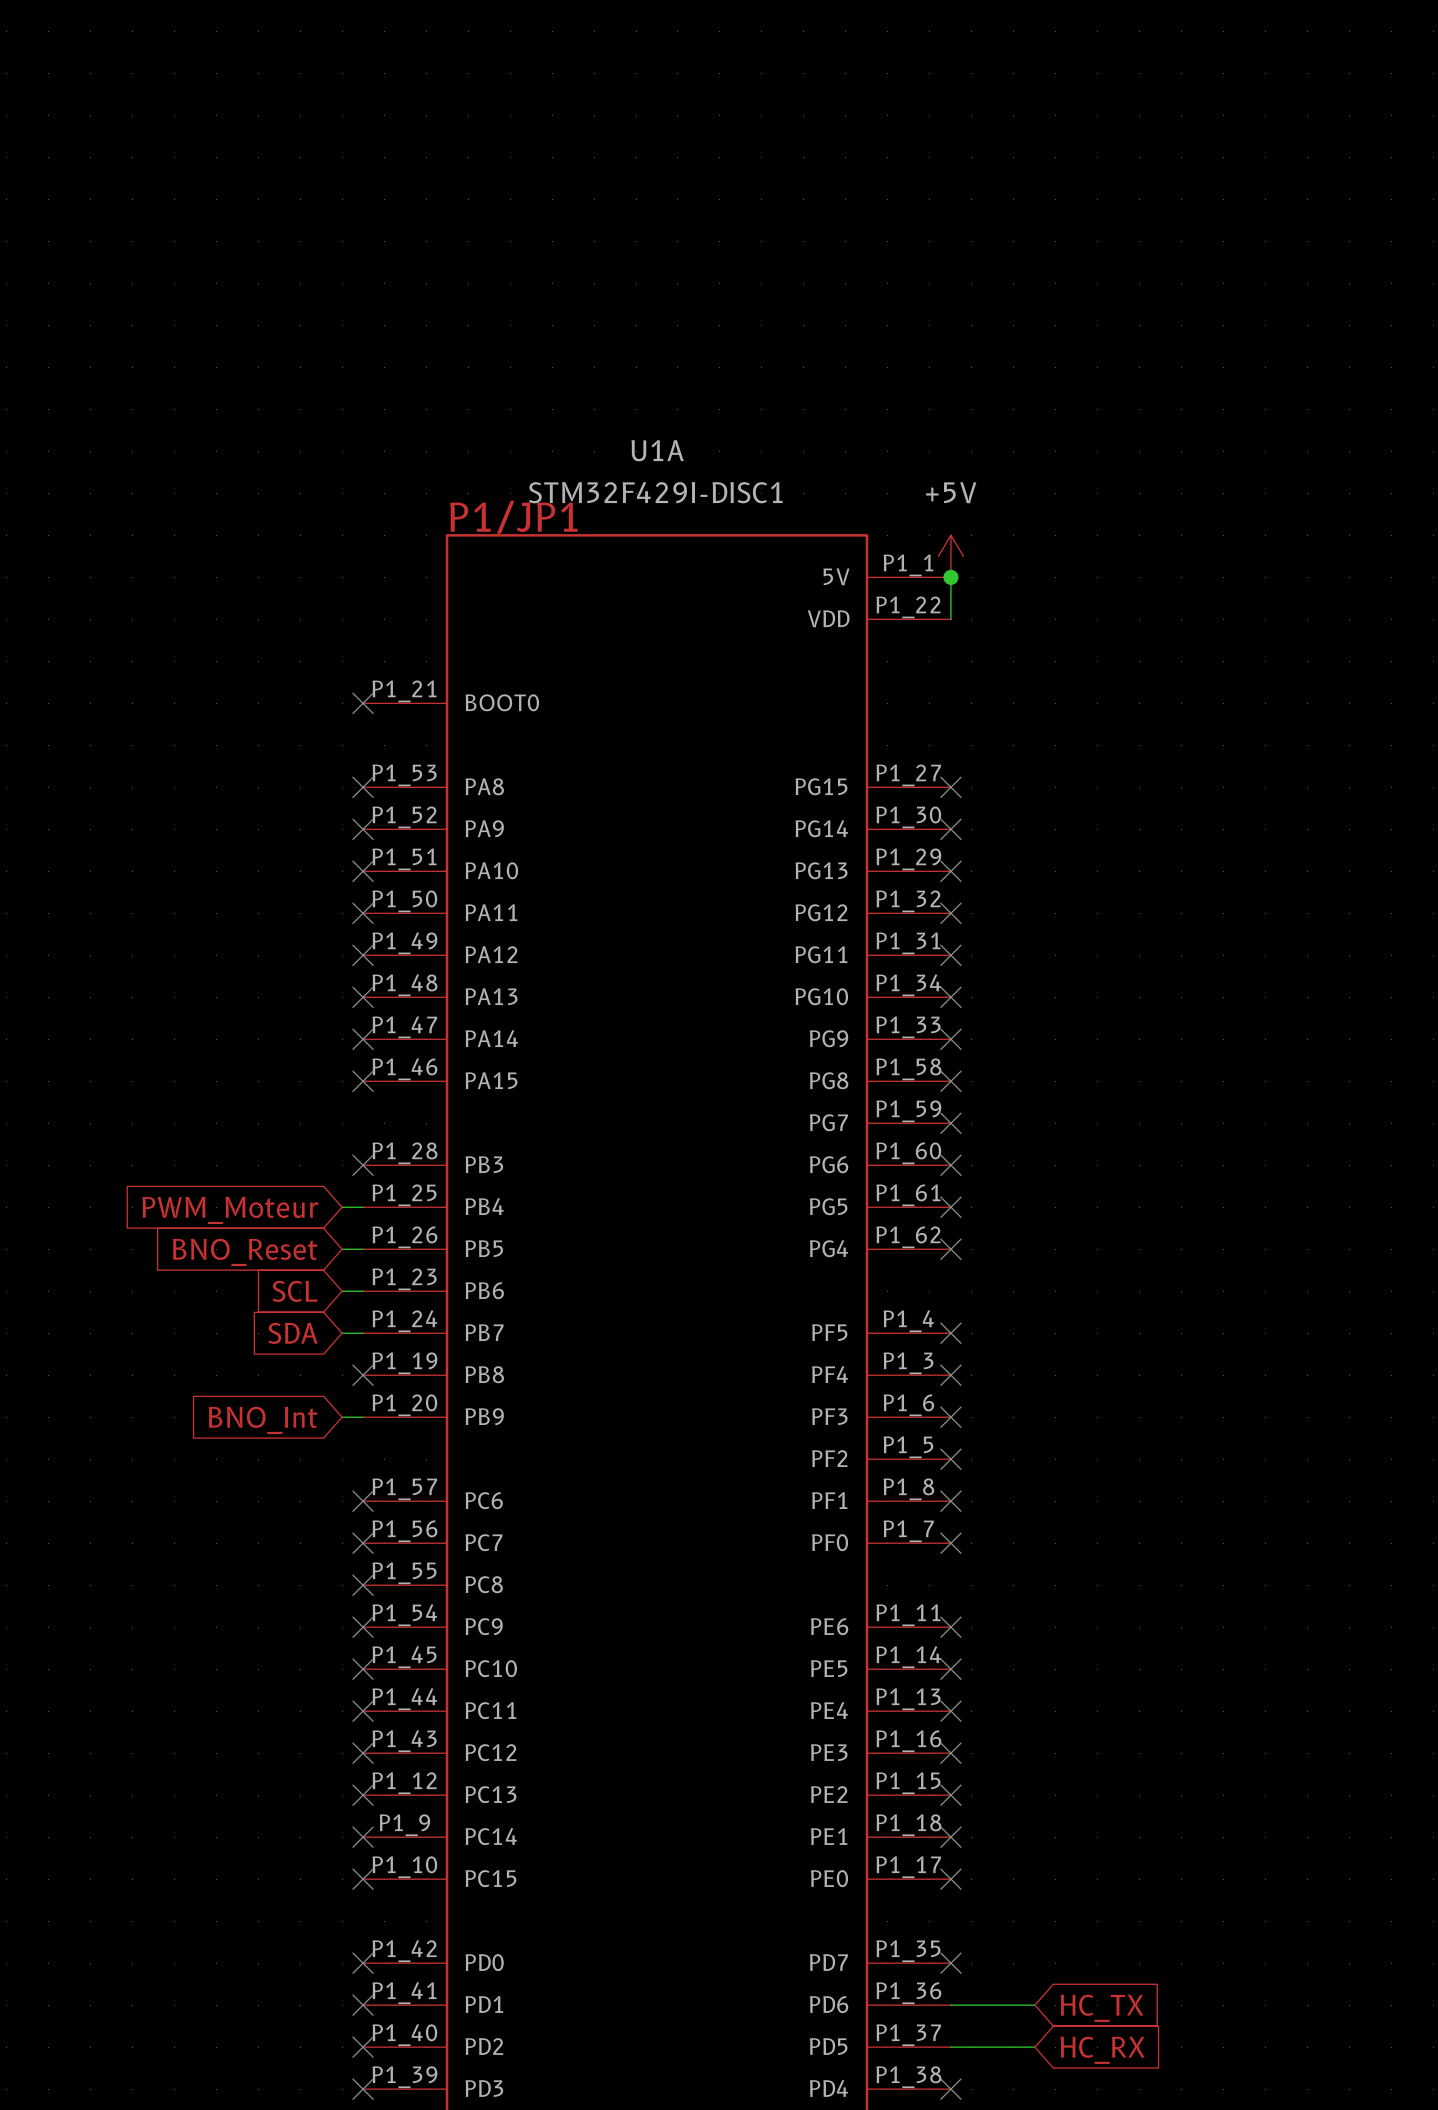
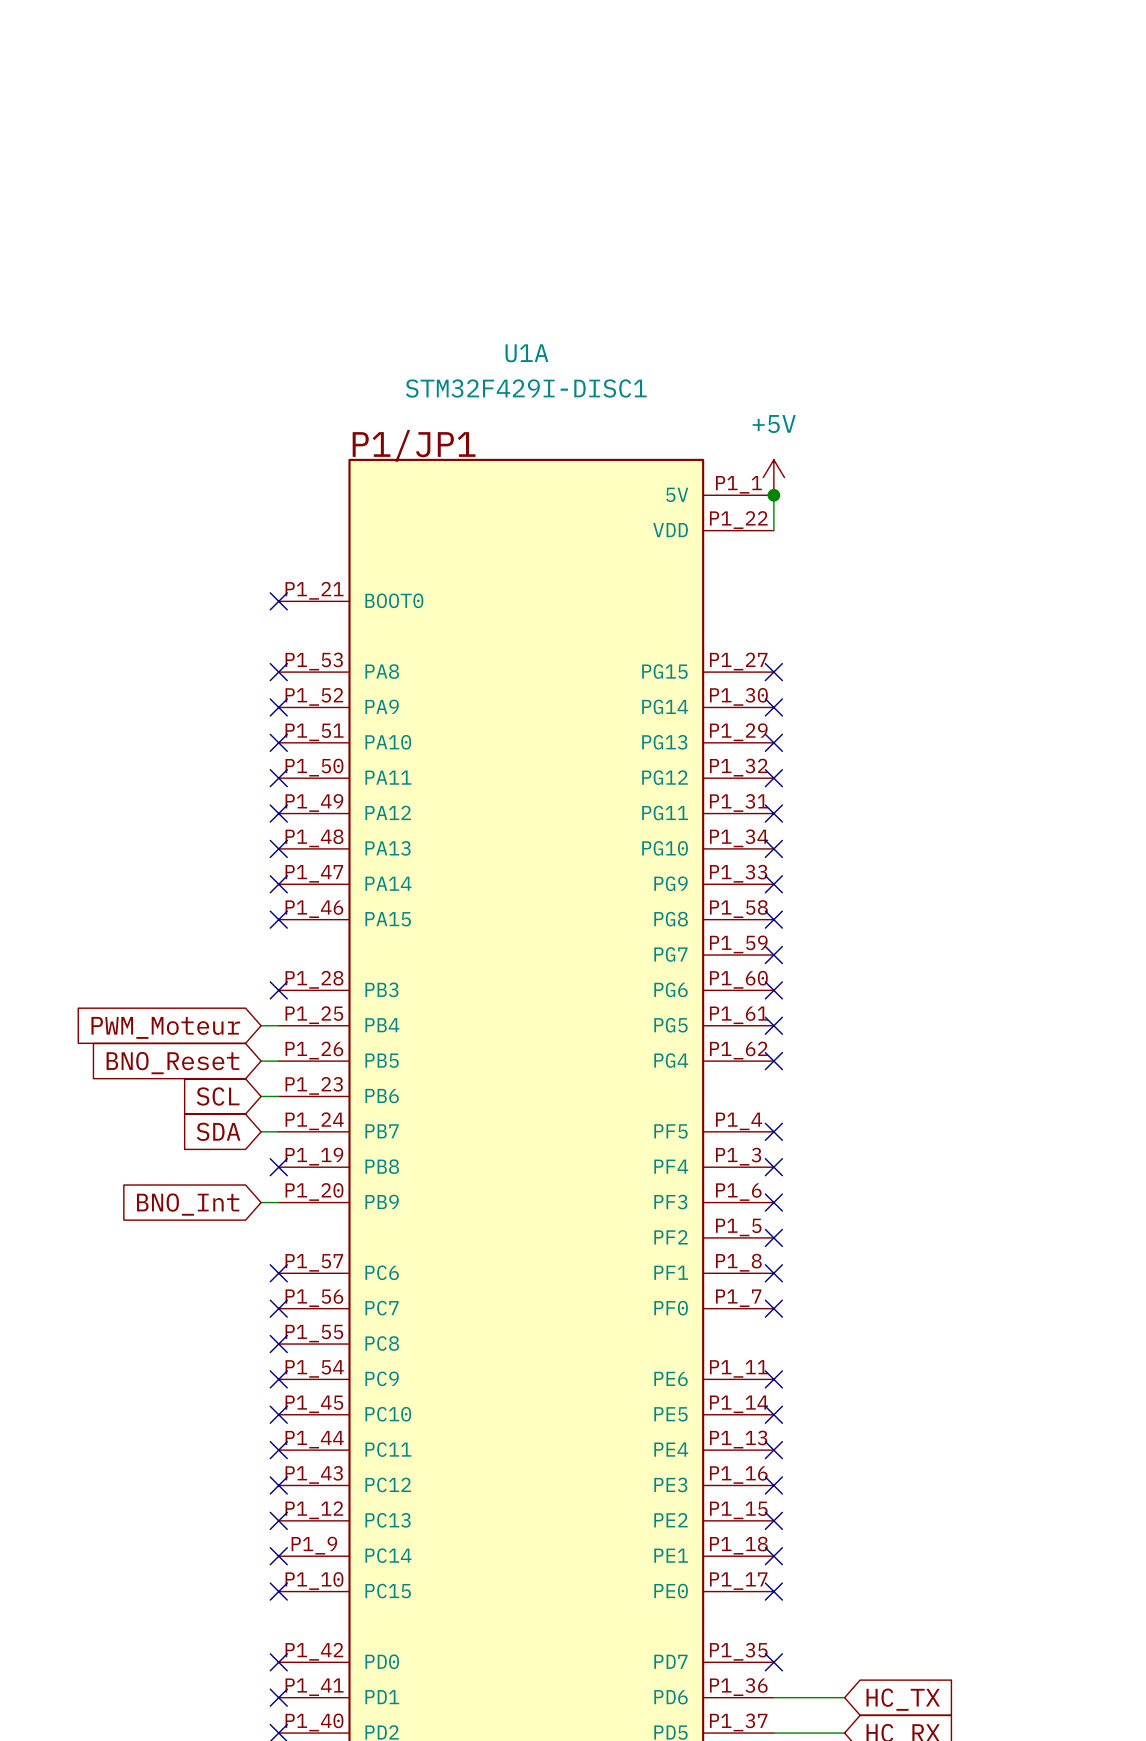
U1A name position: U1A (657, 450) -> U1A (526, 353)
U1A value position: STM32F429I-DISC1 (655, 492) -> STM32F429I-DISC1 (526, 388)

